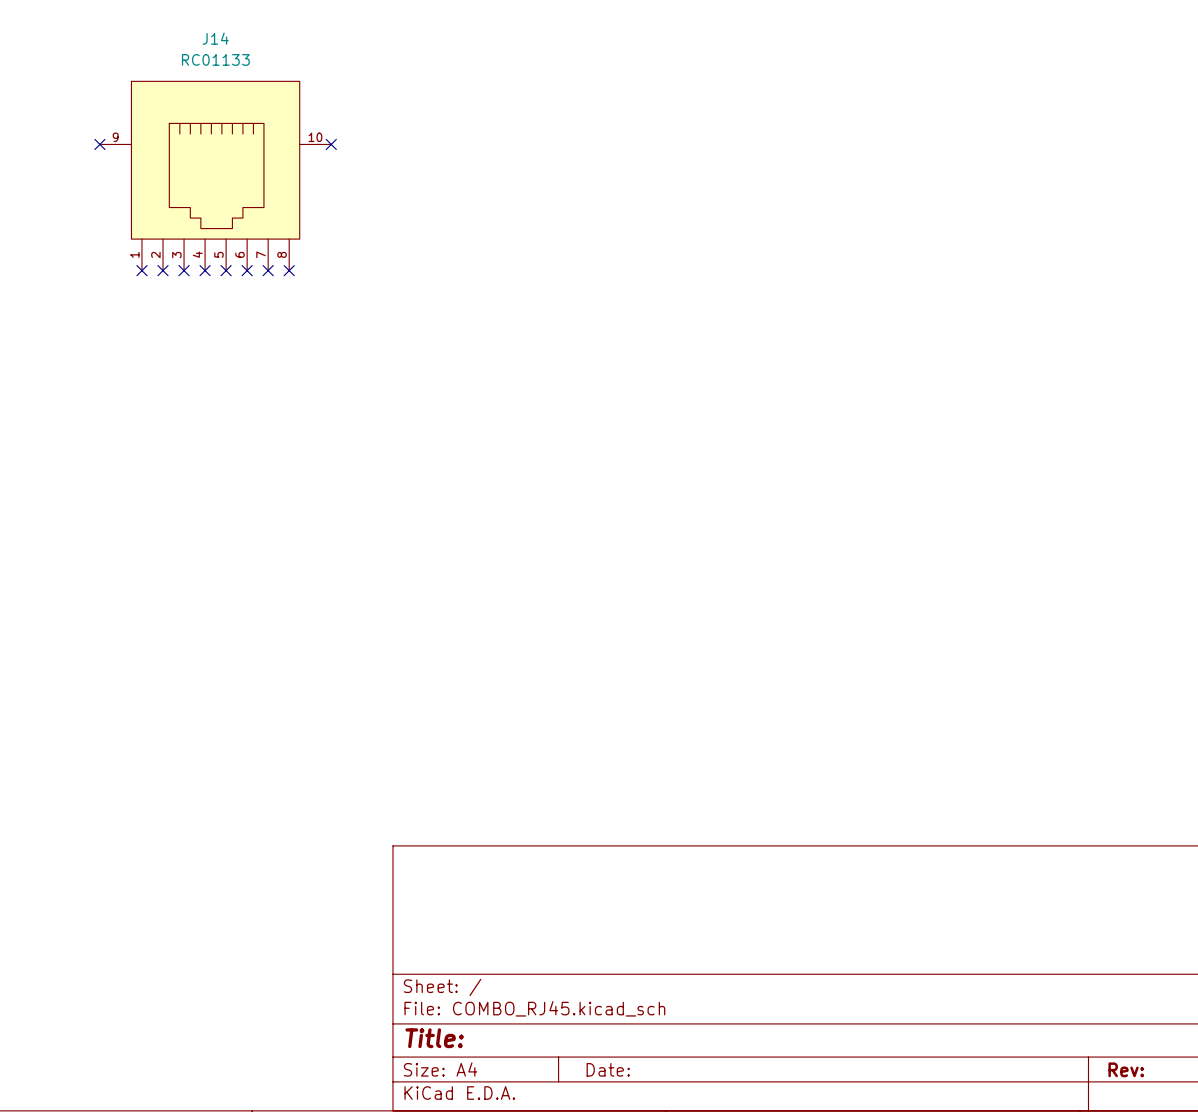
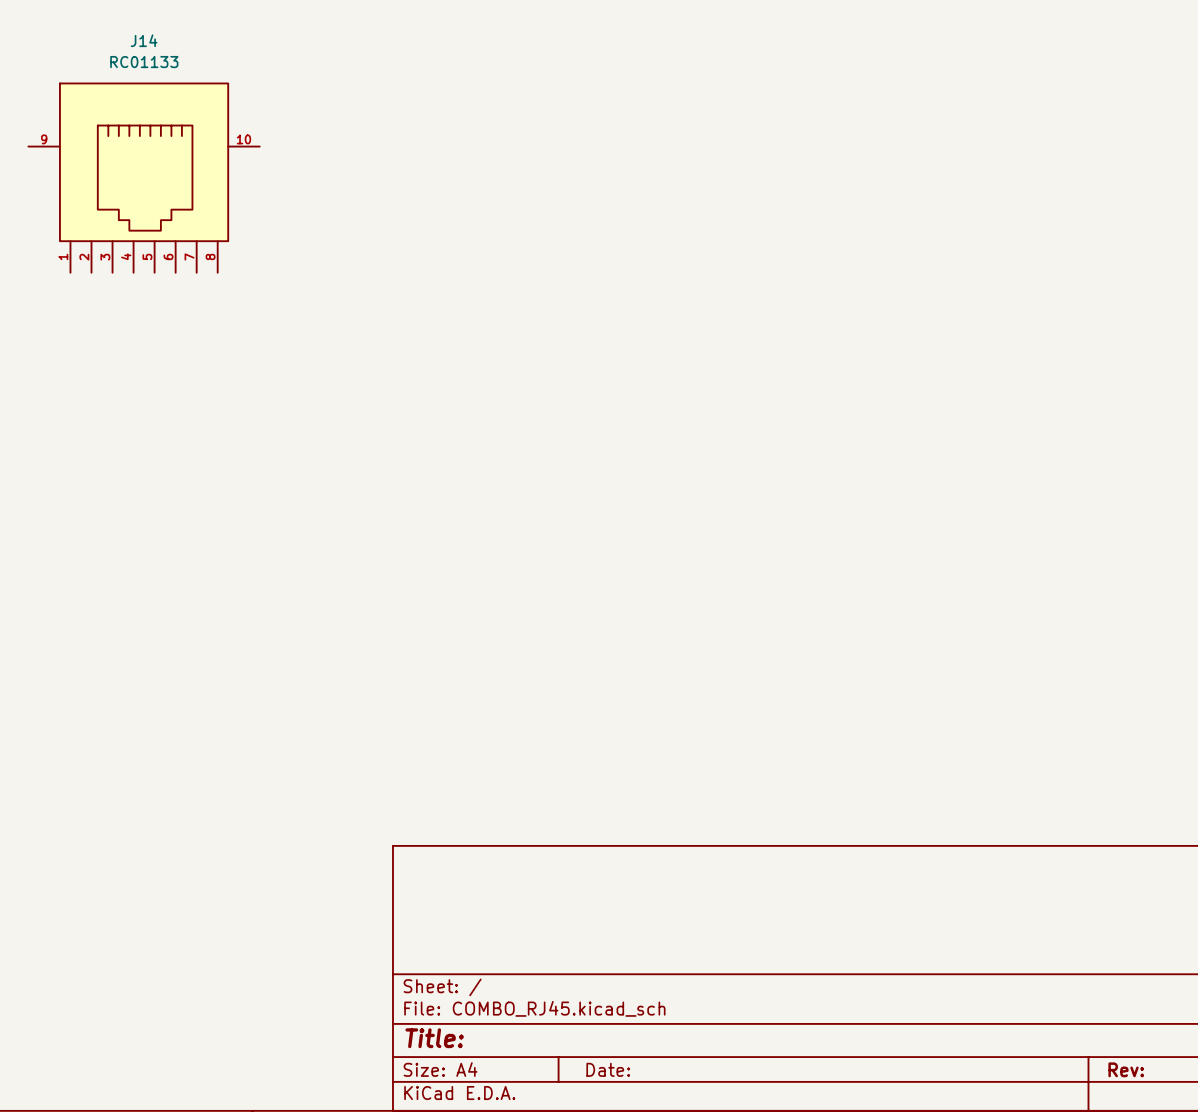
no-connect mark: (99, 144) -> none
no-connect mark: (331, 144) -> none
J14 position: (215, 175) -> (144, 178)
no-connect mark: (141, 270) -> none
no-connect mark: (163, 270) -> none
no-connect mark: (184, 270) -> none
no-connect mark: (205, 270) -> none
no-connect mark: (226, 270) -> none
no-connect mark: (247, 270) -> none
no-connect mark: (268, 270) -> none
no-connect mark: (289, 270) -> none

